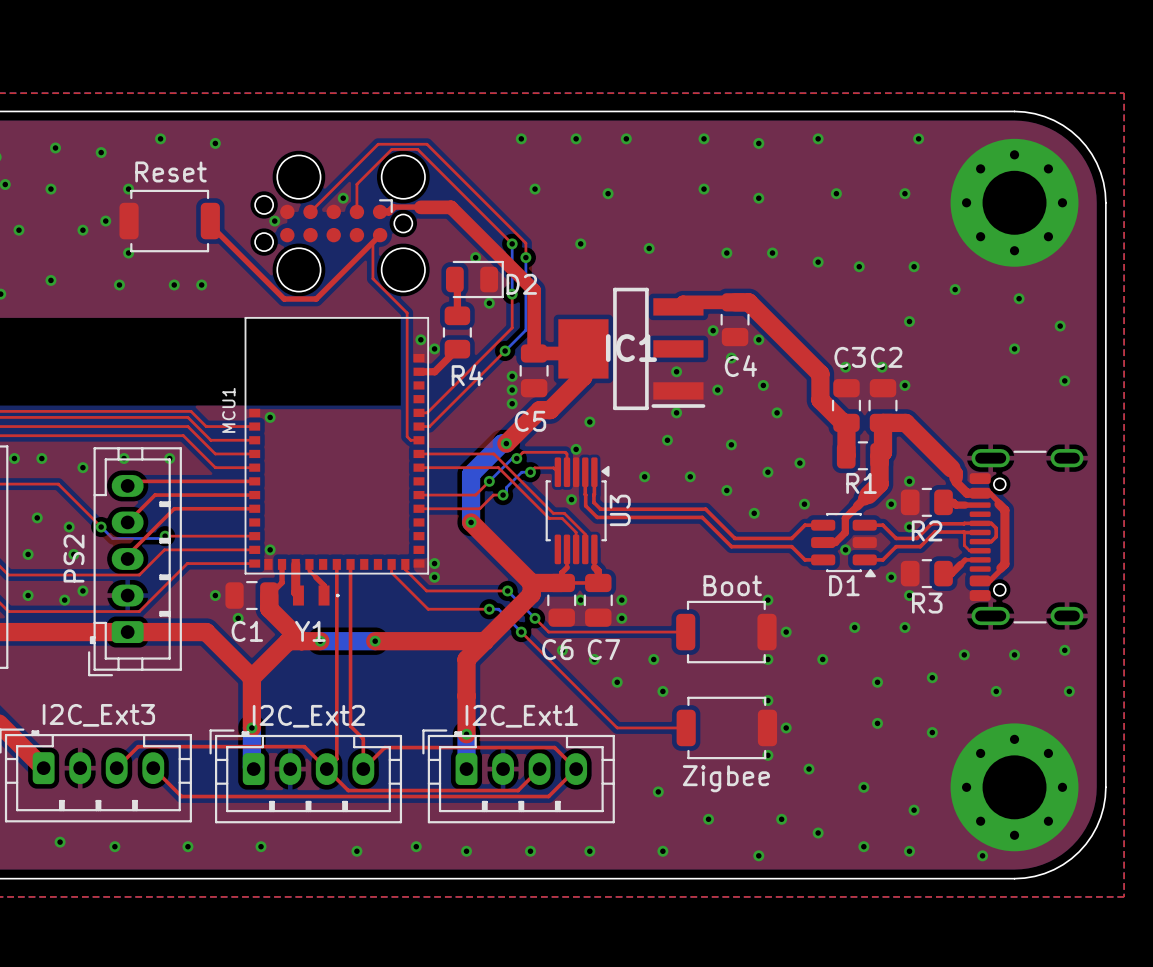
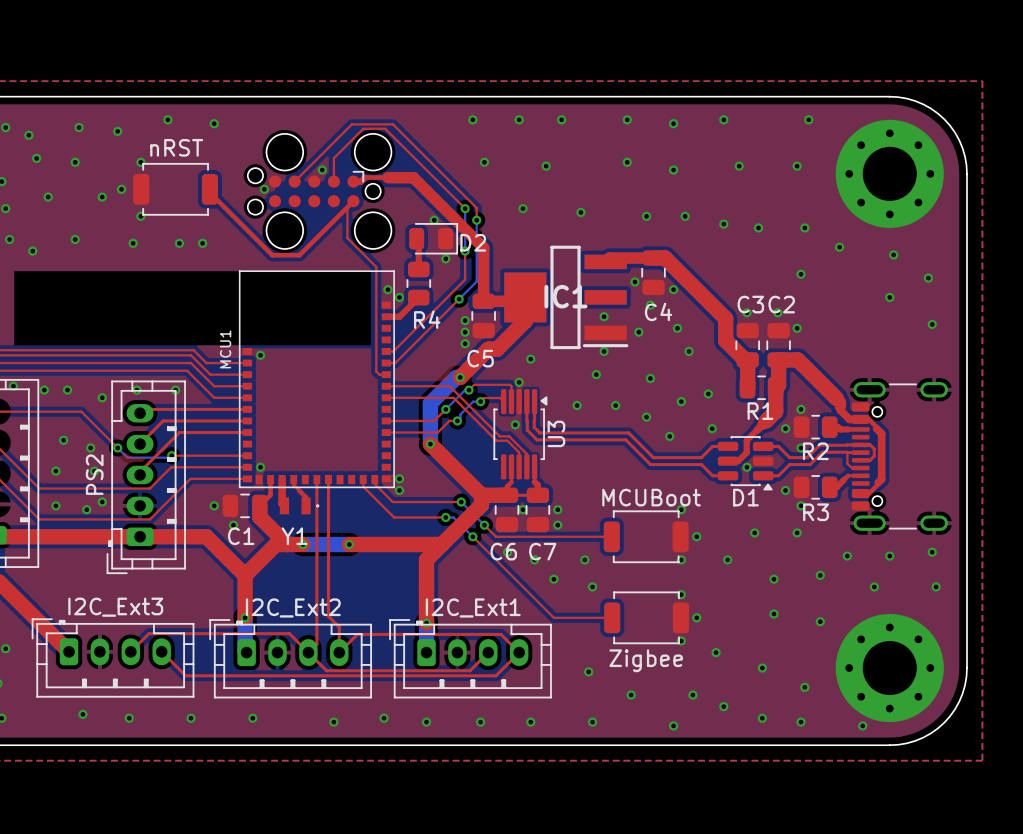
Reset name: Reset (170, 171) -> nRST (176, 147)
Boot name: Boot (732, 585) -> MCUBoot (651, 497)

